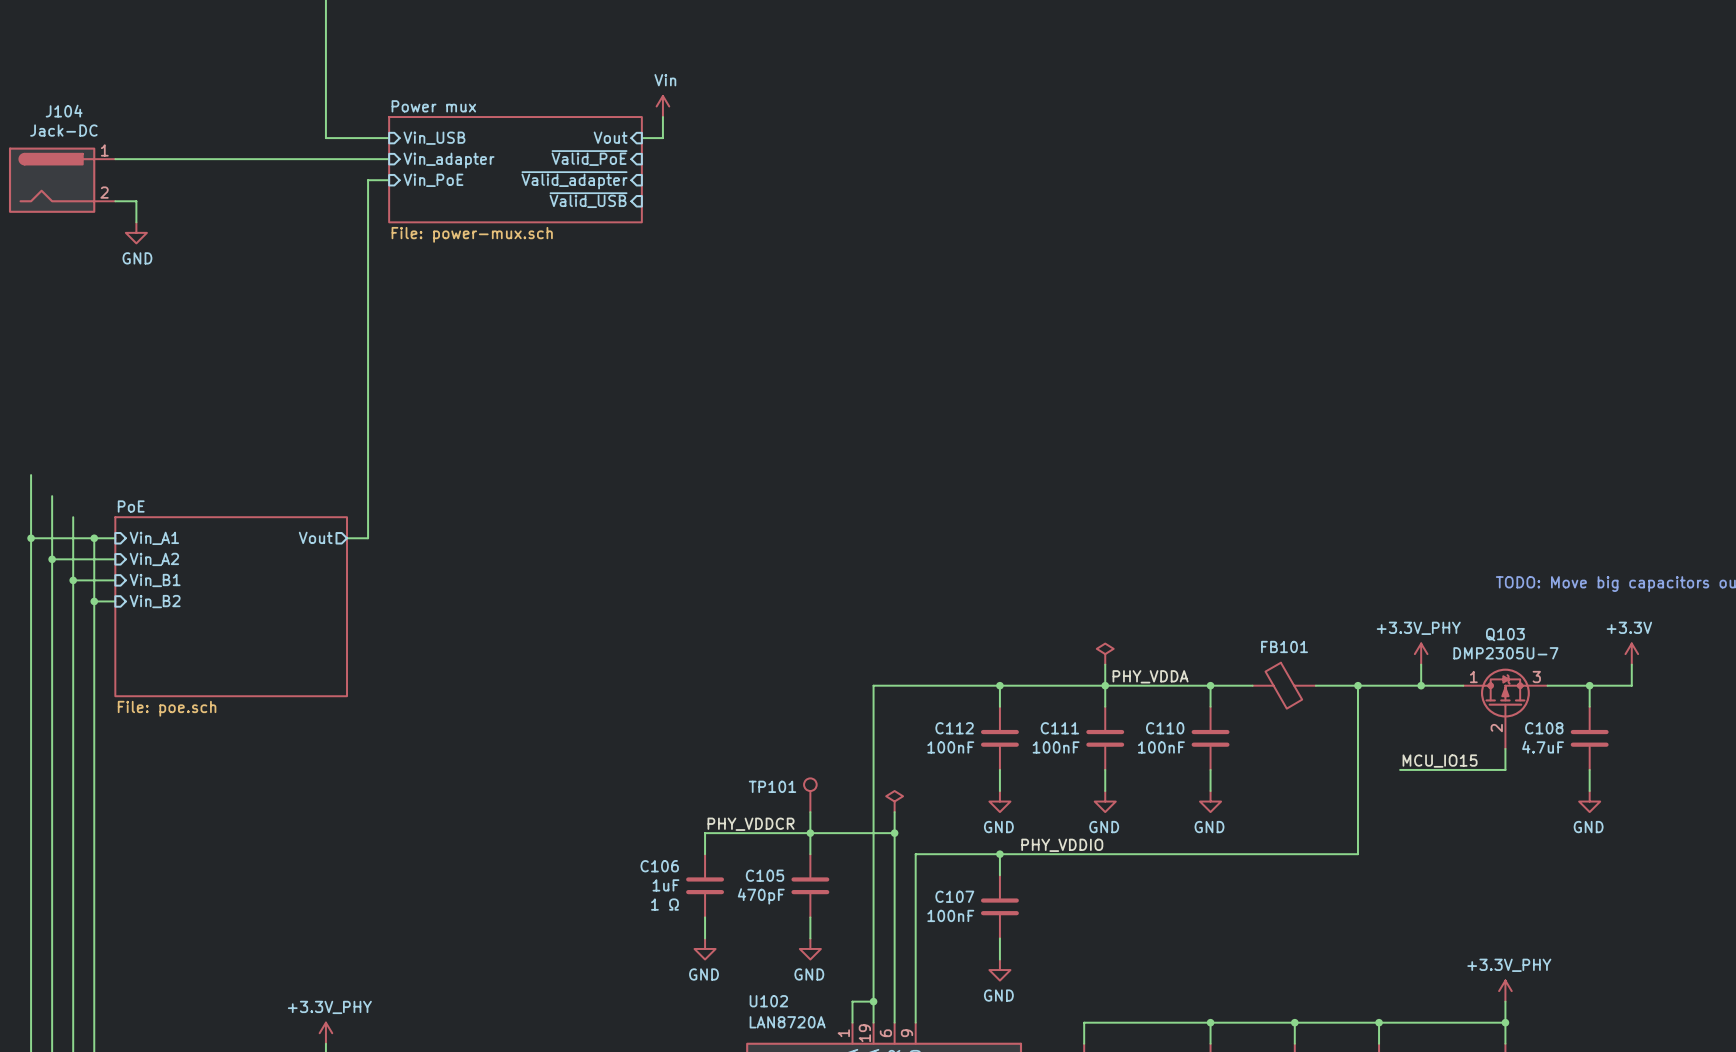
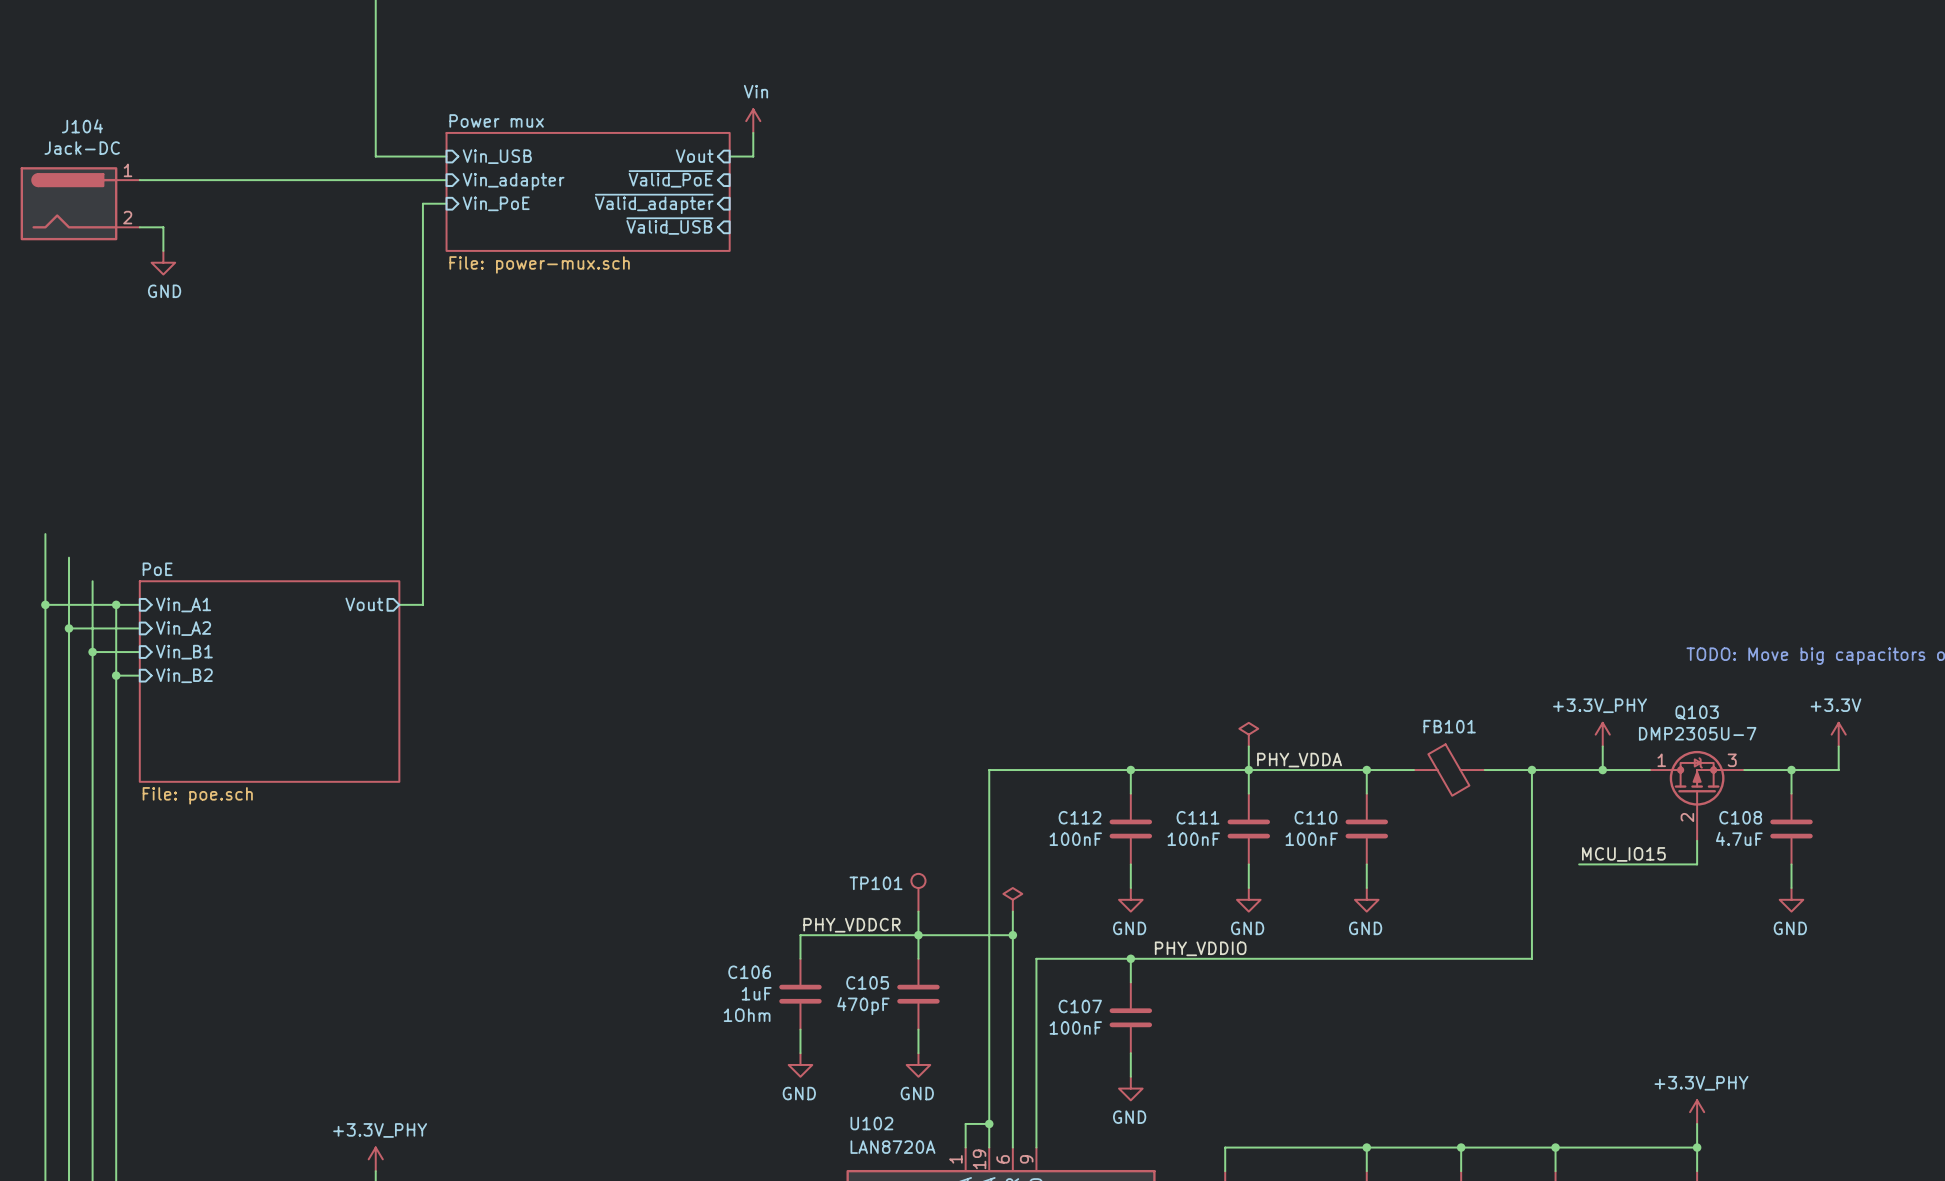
C106 text: 1 Ω (664, 904) -> 1Ohm (747, 1015)

